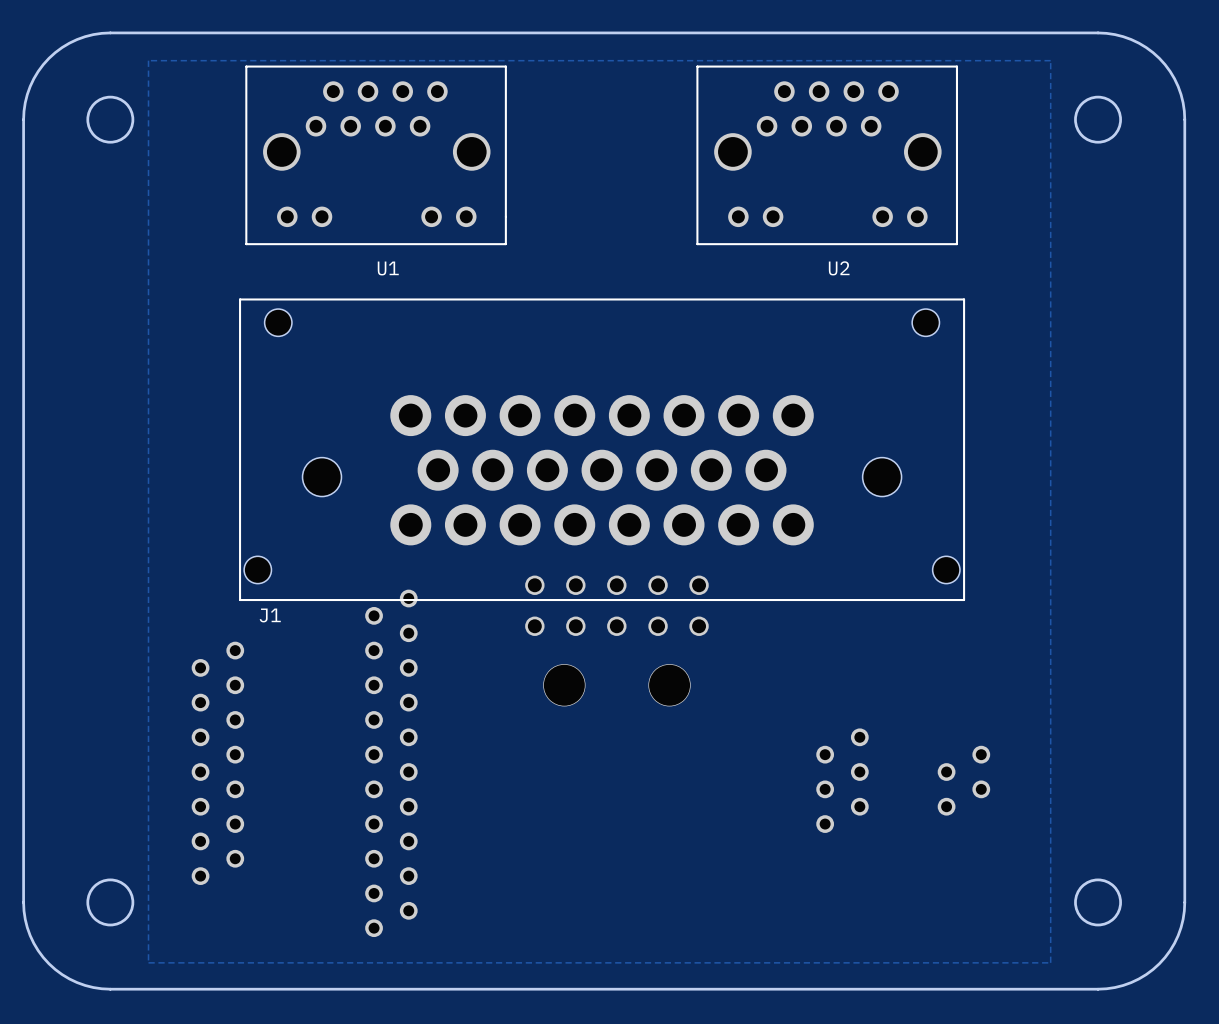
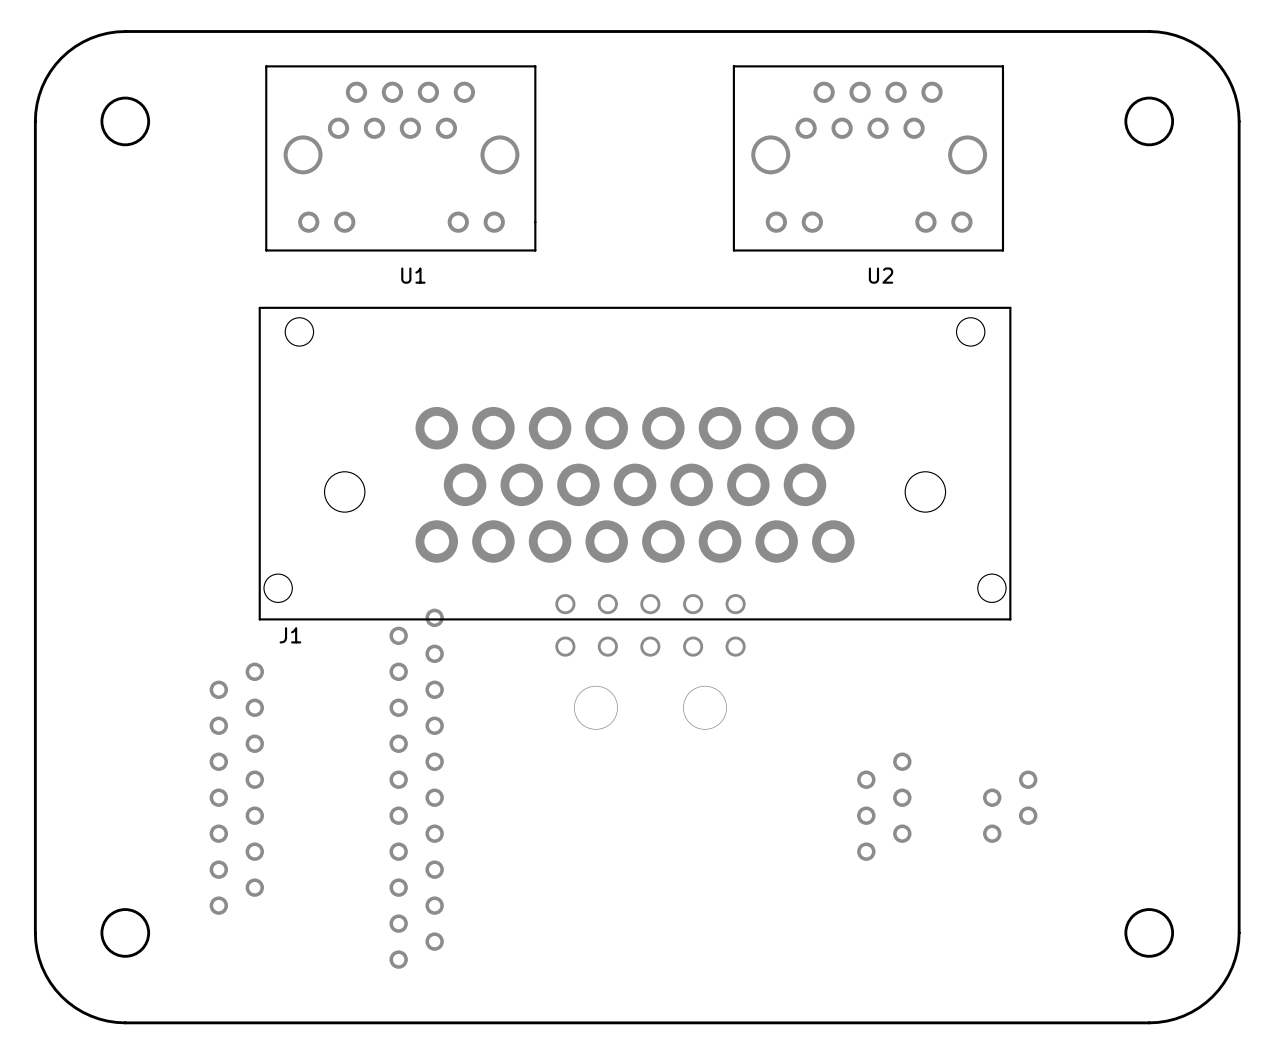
zone outline: (148, 60) (148, 962) (1050, 962) (1050, 60) (148, 60) -> none

